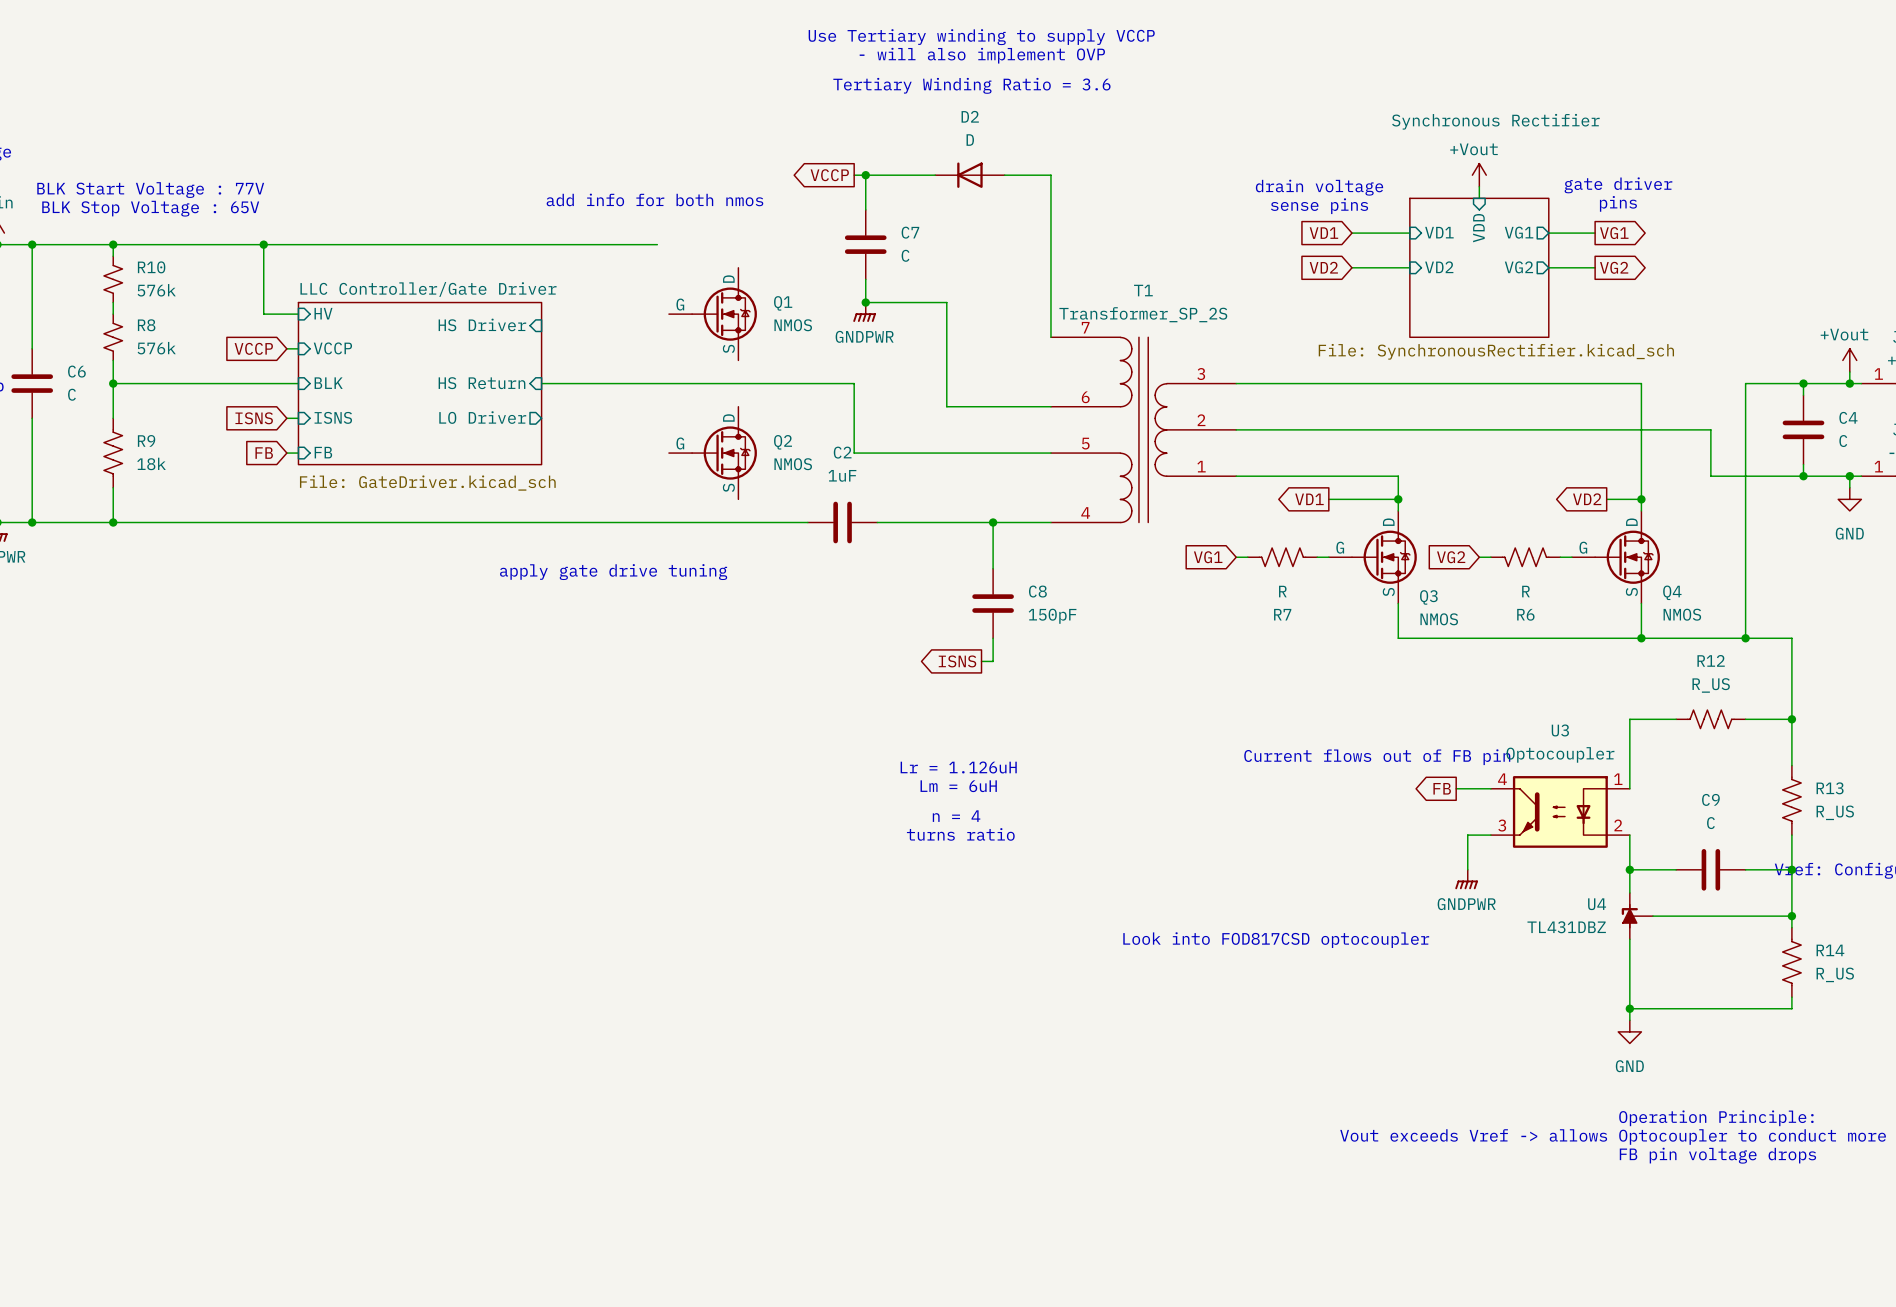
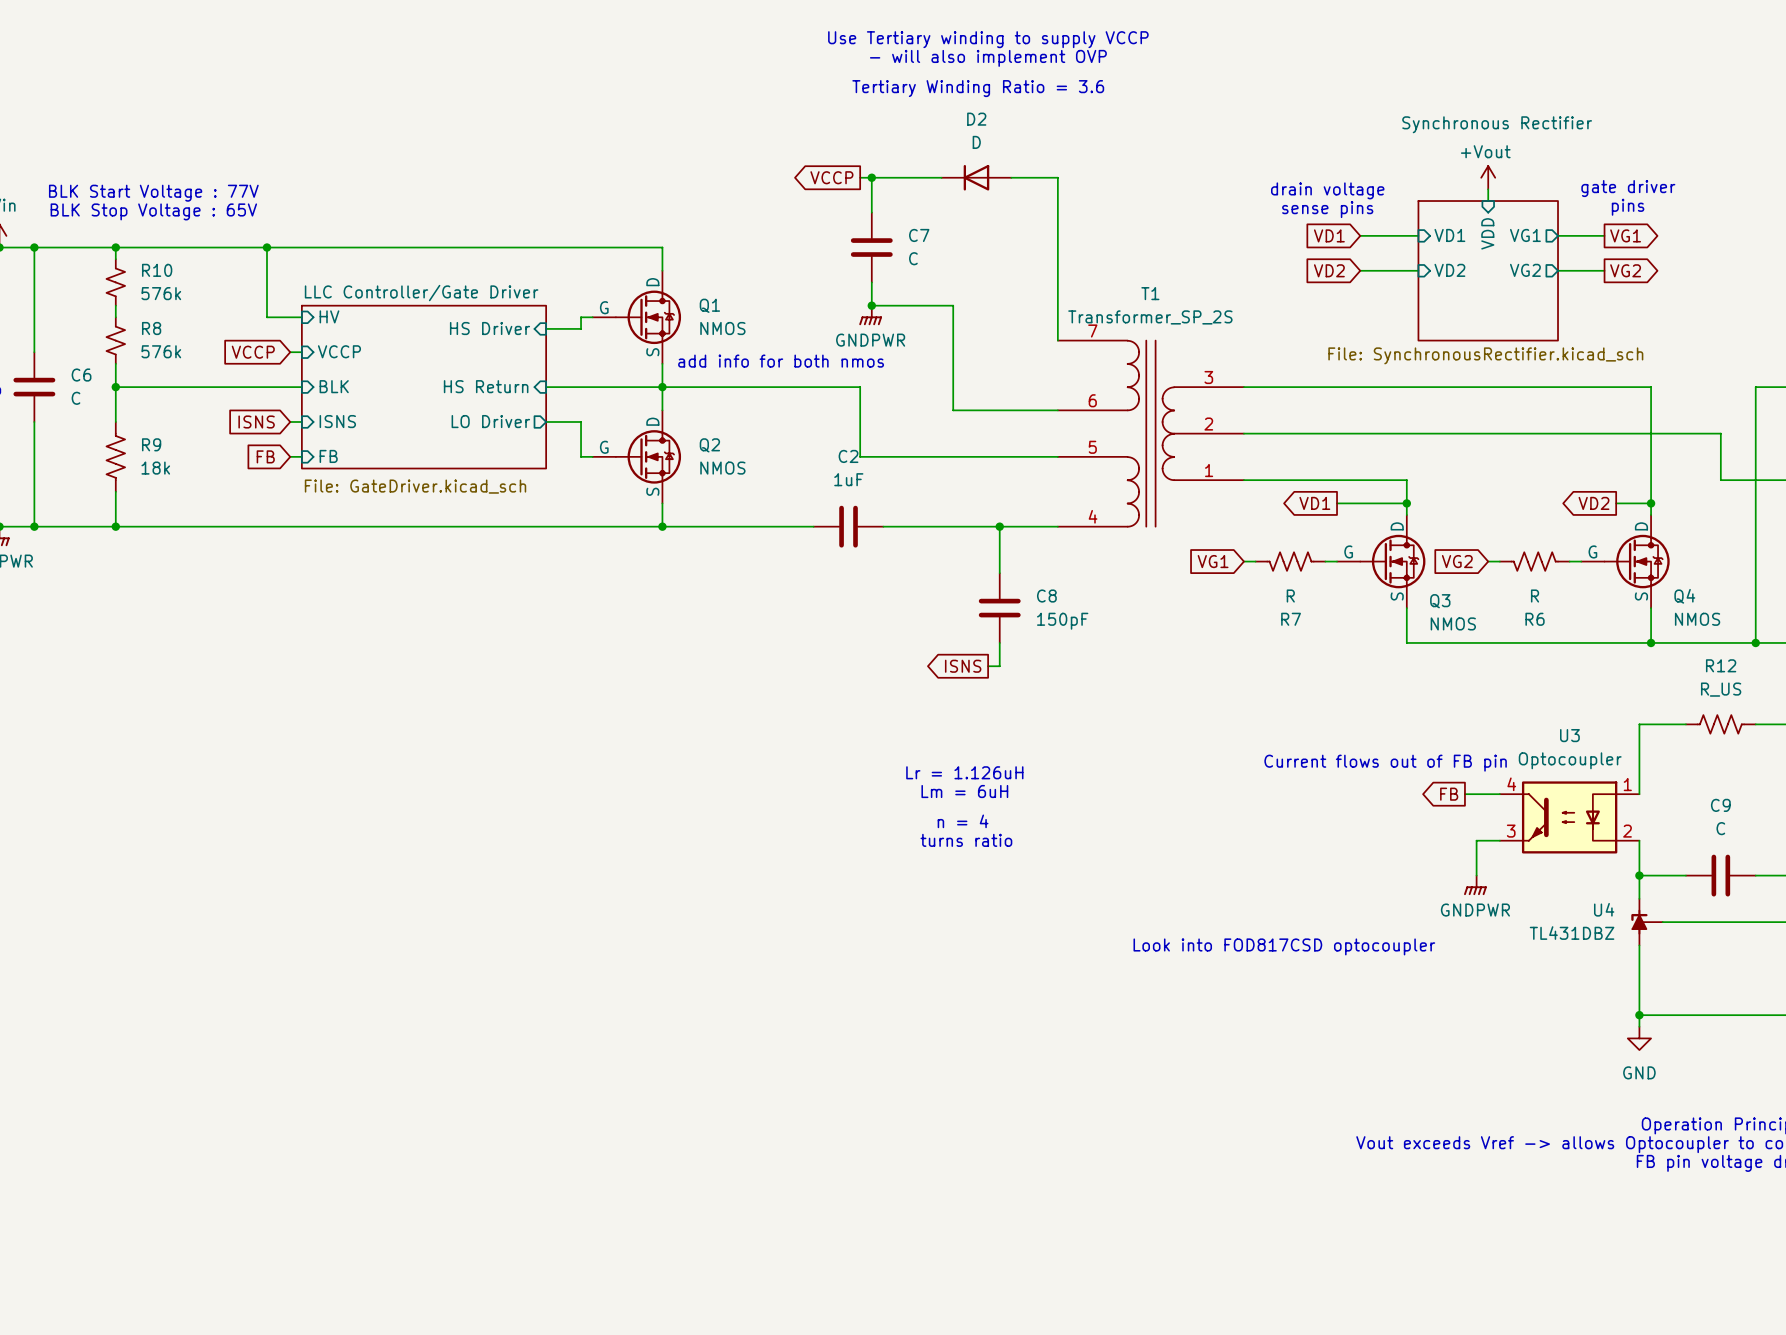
text position: add info for both nmos (654, 199) -> add info for both nmos (781, 361)
wire: none -> (662, 247) (662, 270)
wire: none -> (592, 317) (581, 317) (581, 328) (546, 328)
Q1 position: (712, 314) -> (636, 317)
wire: none -> (662, 363) (662, 410)
junction: none -> (662, 387)
wire: none -> (546, 421) (581, 421) (581, 456) (592, 456)
Q2 position: (712, 453) -> (636, 456)
wire: none -> (662, 503) (662, 526)
junction: none -> (662, 526)
text: apply gate drive tuning (613, 572) -> none

